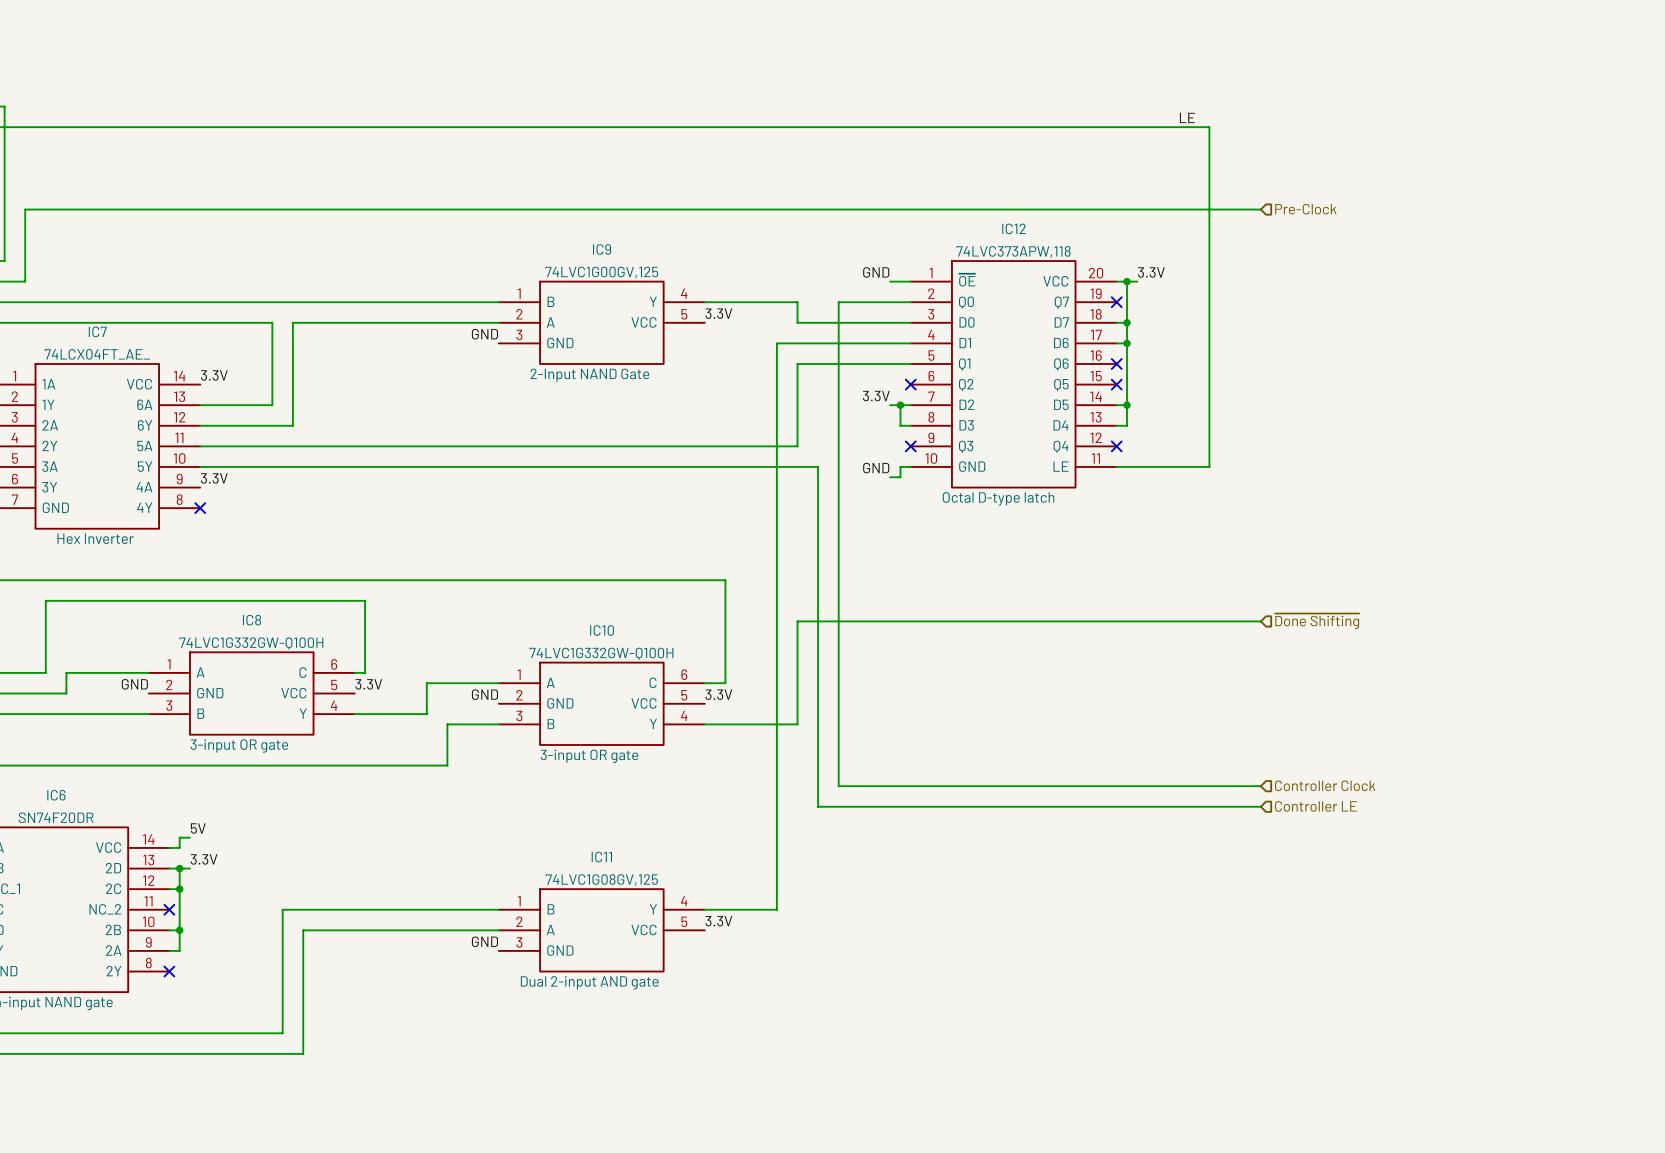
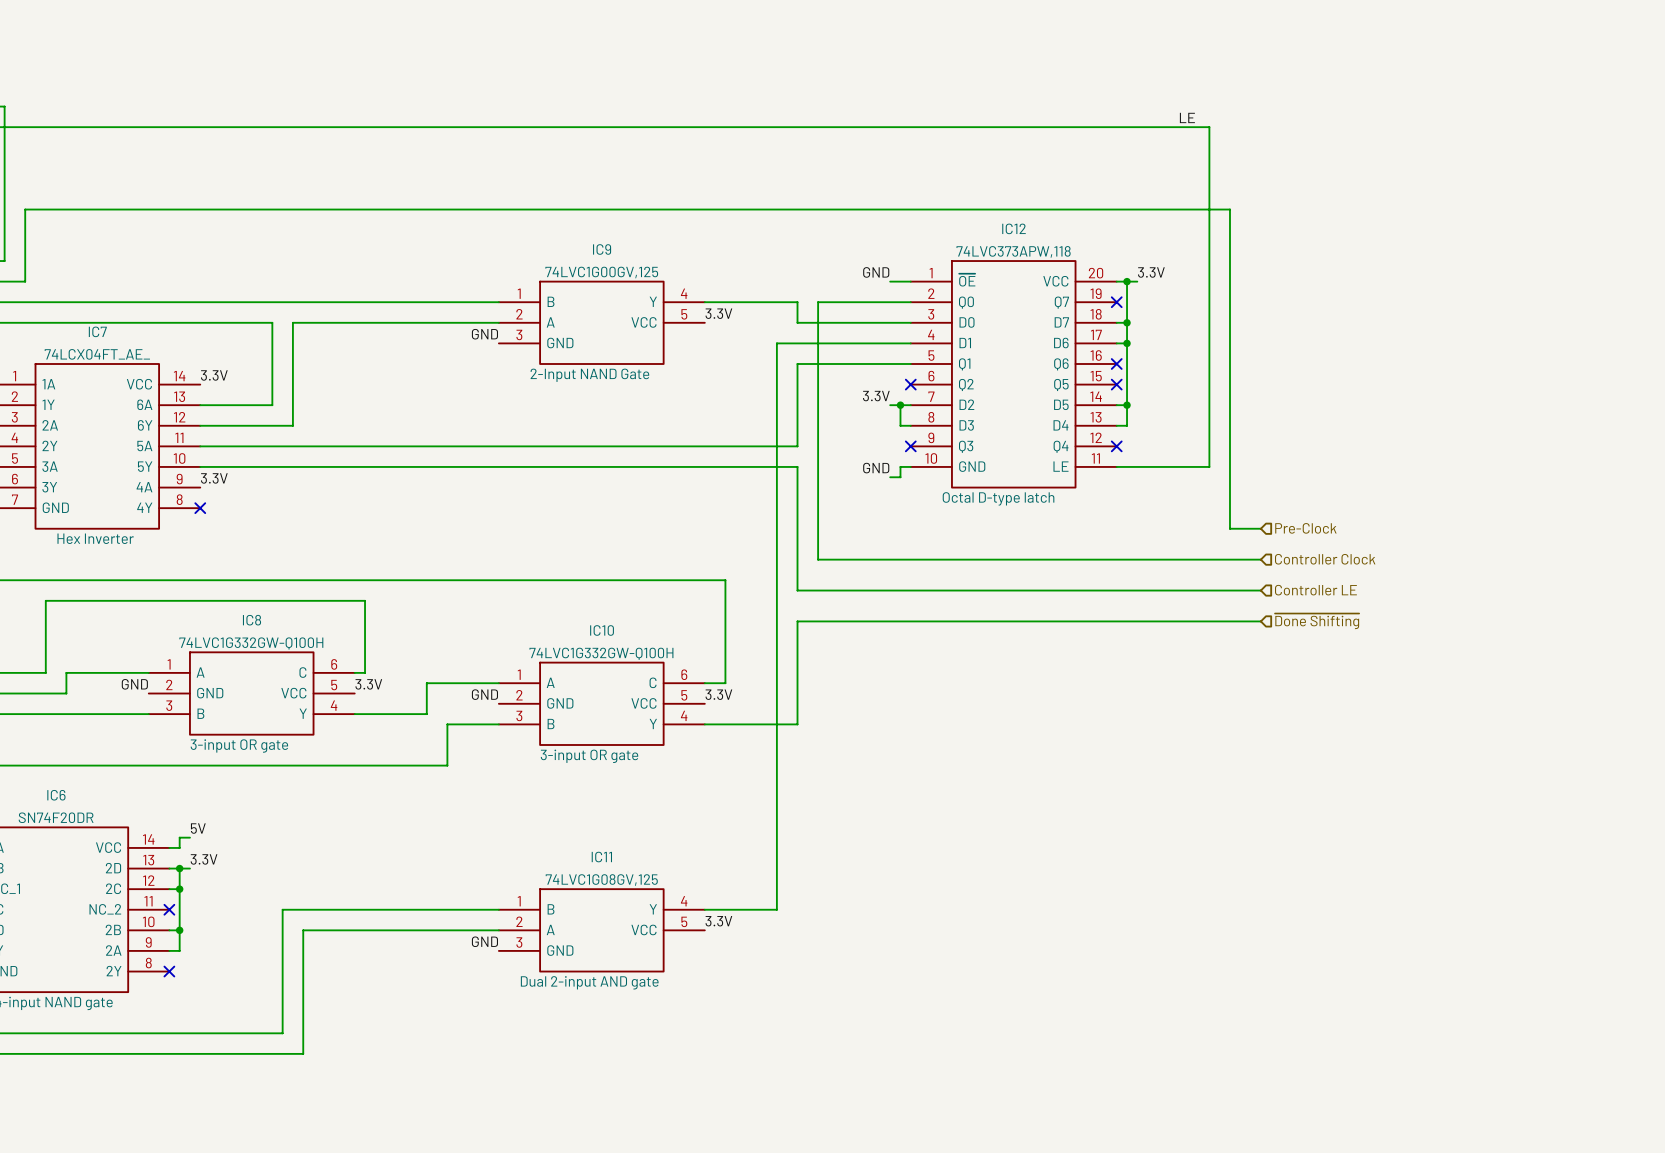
wire: (1229, 209) (1260, 209) -> (1229, 209) (1229, 528) (1260, 528)
hierarchical label: Pre-Clock (1305, 209) -> none
wire: (838, 302) (838, 786) (1260, 786) -> none
wire: (797, 466) (818, 466) -> (838, 302) (818, 302) (818, 466)
wire: none -> (797, 466) (797, 590) (1260, 590)
hierarchical label: none -> Pre-Clock (1305, 528)
wire: (818, 559) (818, 806) (1260, 806) -> (818, 559) (1260, 559)
hierarchical label: none -> Controller Clock (1325, 559)
hierarchical label: none -> Controller LE (1315, 590)
hierarchical label: Controller Clock (1325, 785) -> none
hierarchical label: Controller LE (1315, 806) -> none

